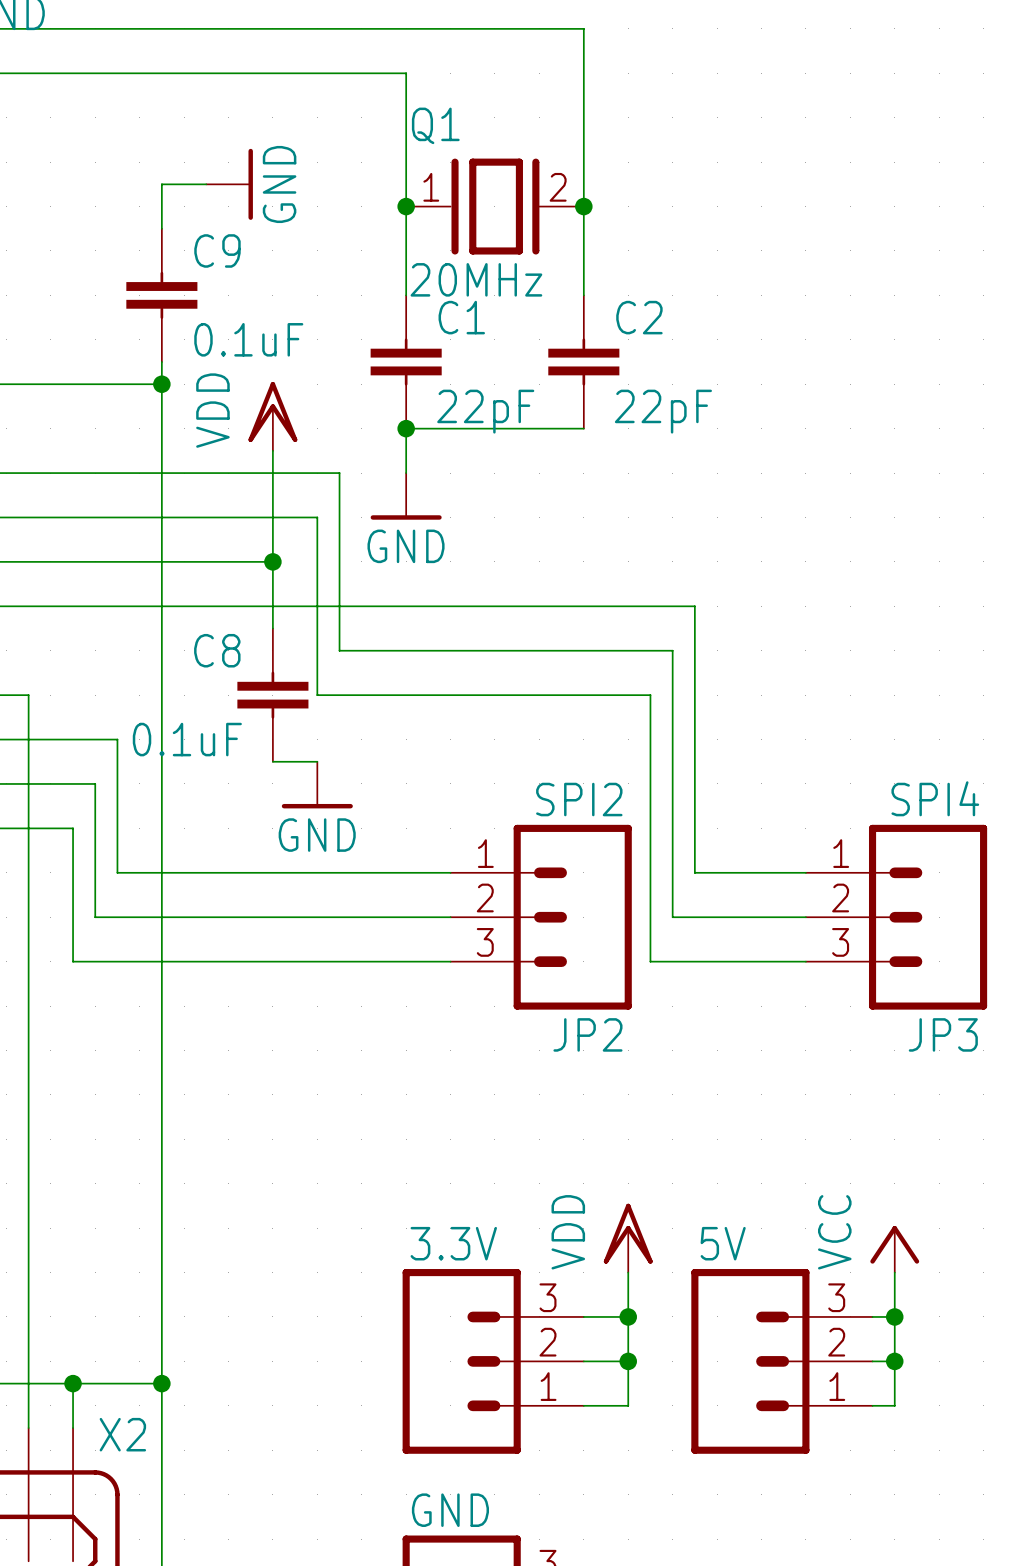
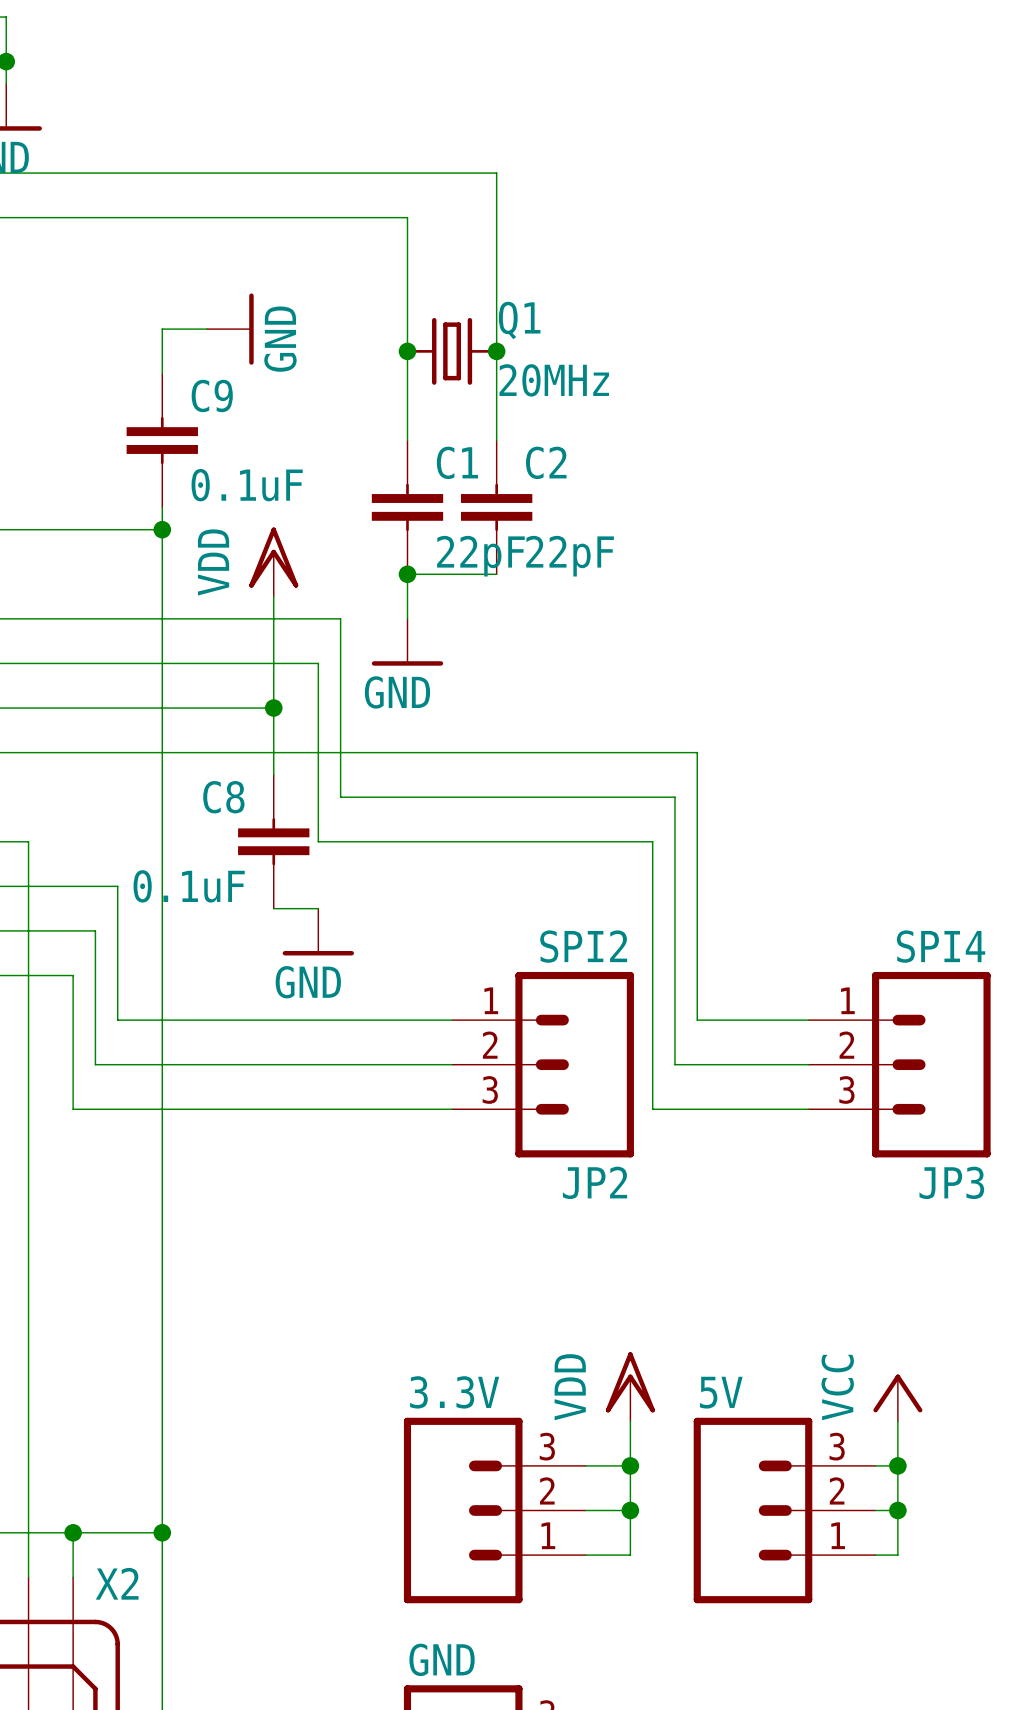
wire: (494, 28) (583, 28) (583, 295) -> (496, 173) (496, 440)
Q1 name position: Q1 (435, 125) -> Q1 (519, 320)
Q1 symbol: [406, 158, 584, 255] -> [406, 317, 498, 385]
junction position: (583, 206) -> (496, 351)
Q1 value position: 20MHz (476, 279) -> 20MHz (554, 380)
C2 position: (583, 362) -> (496, 507)
wire: (494, 428) (583, 428) -> none

